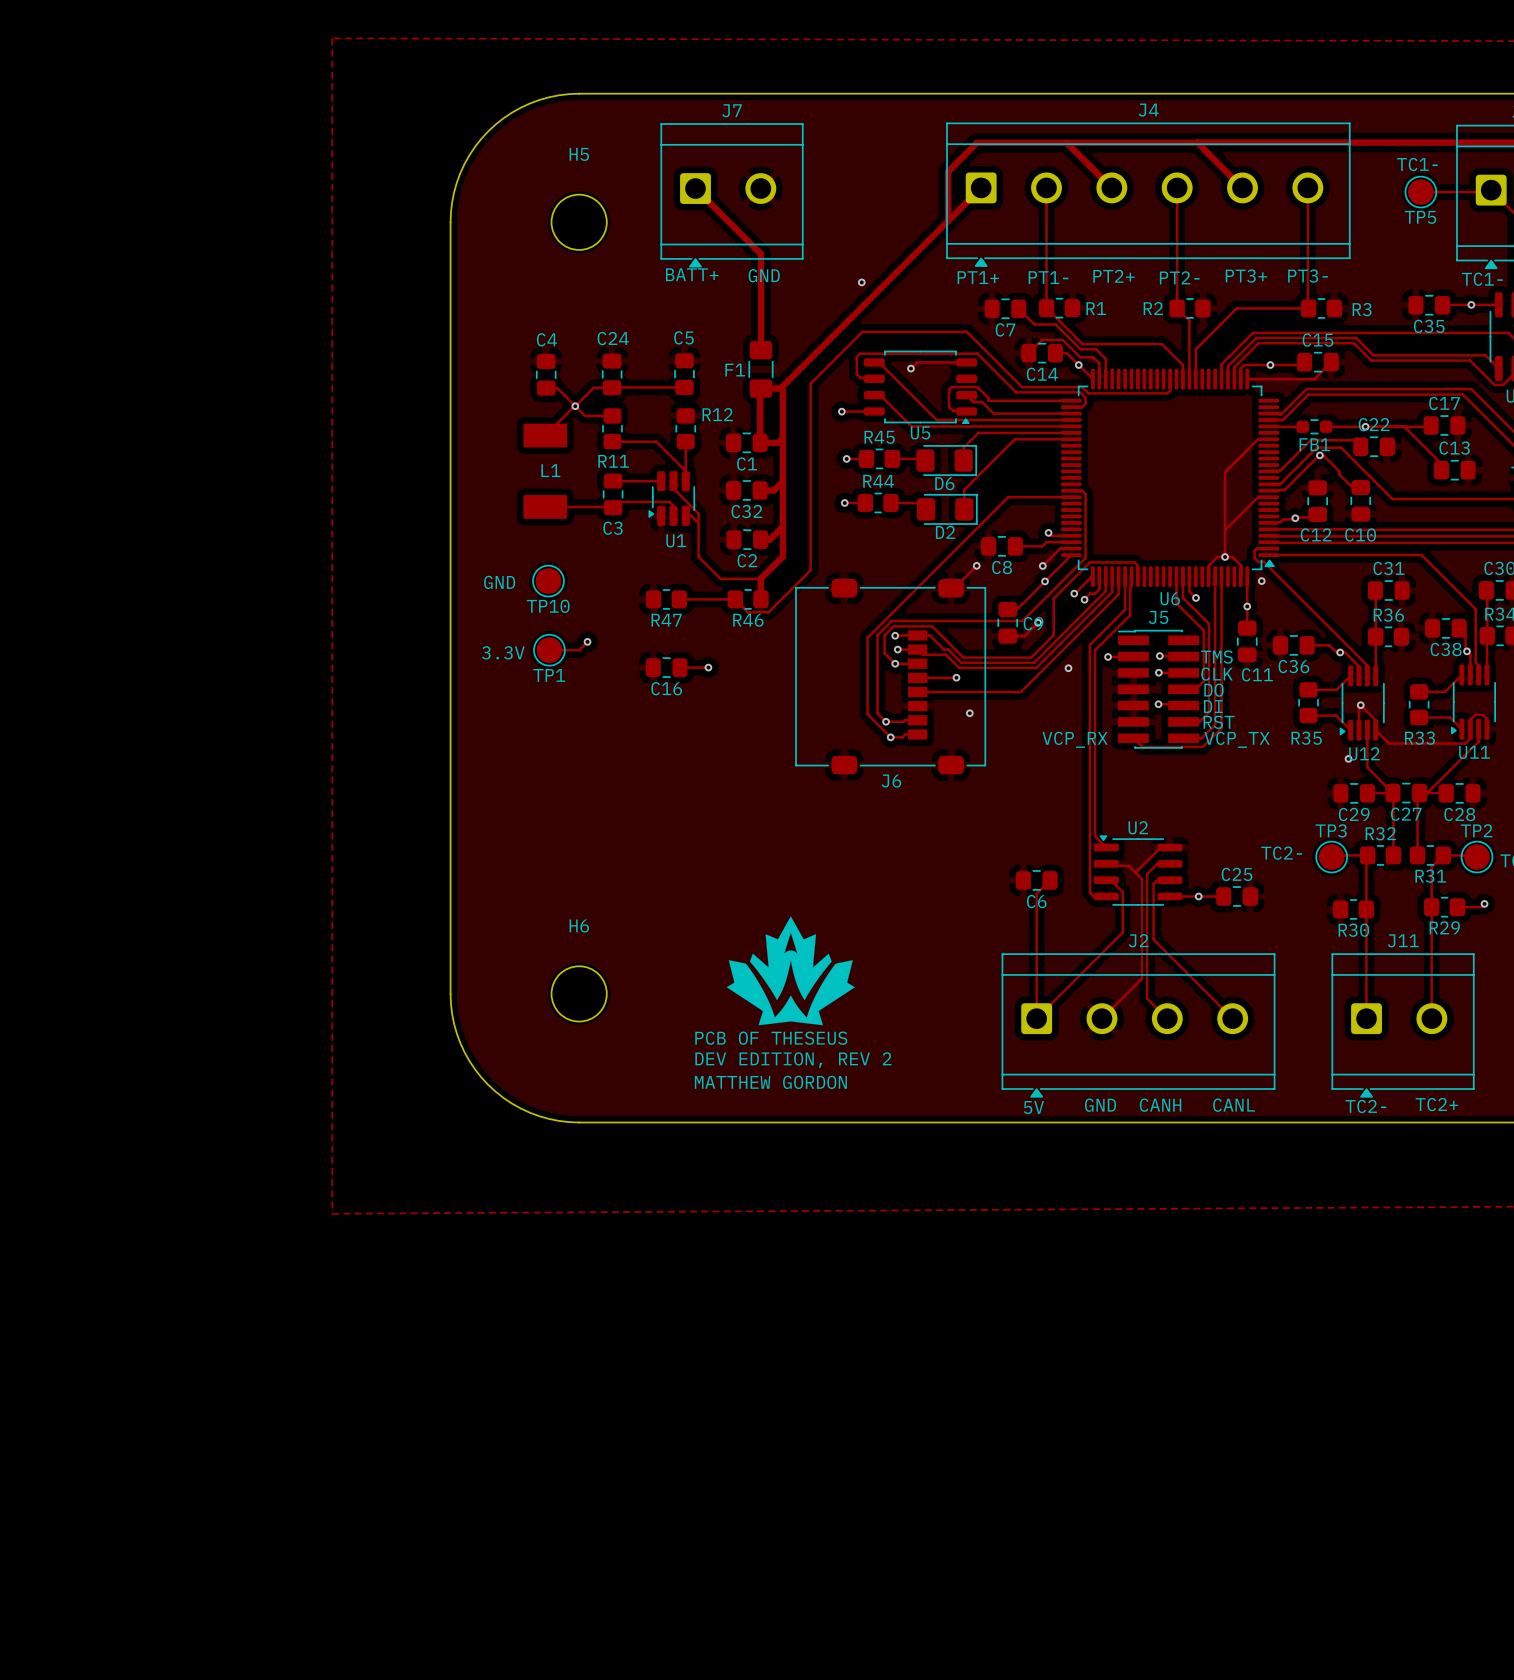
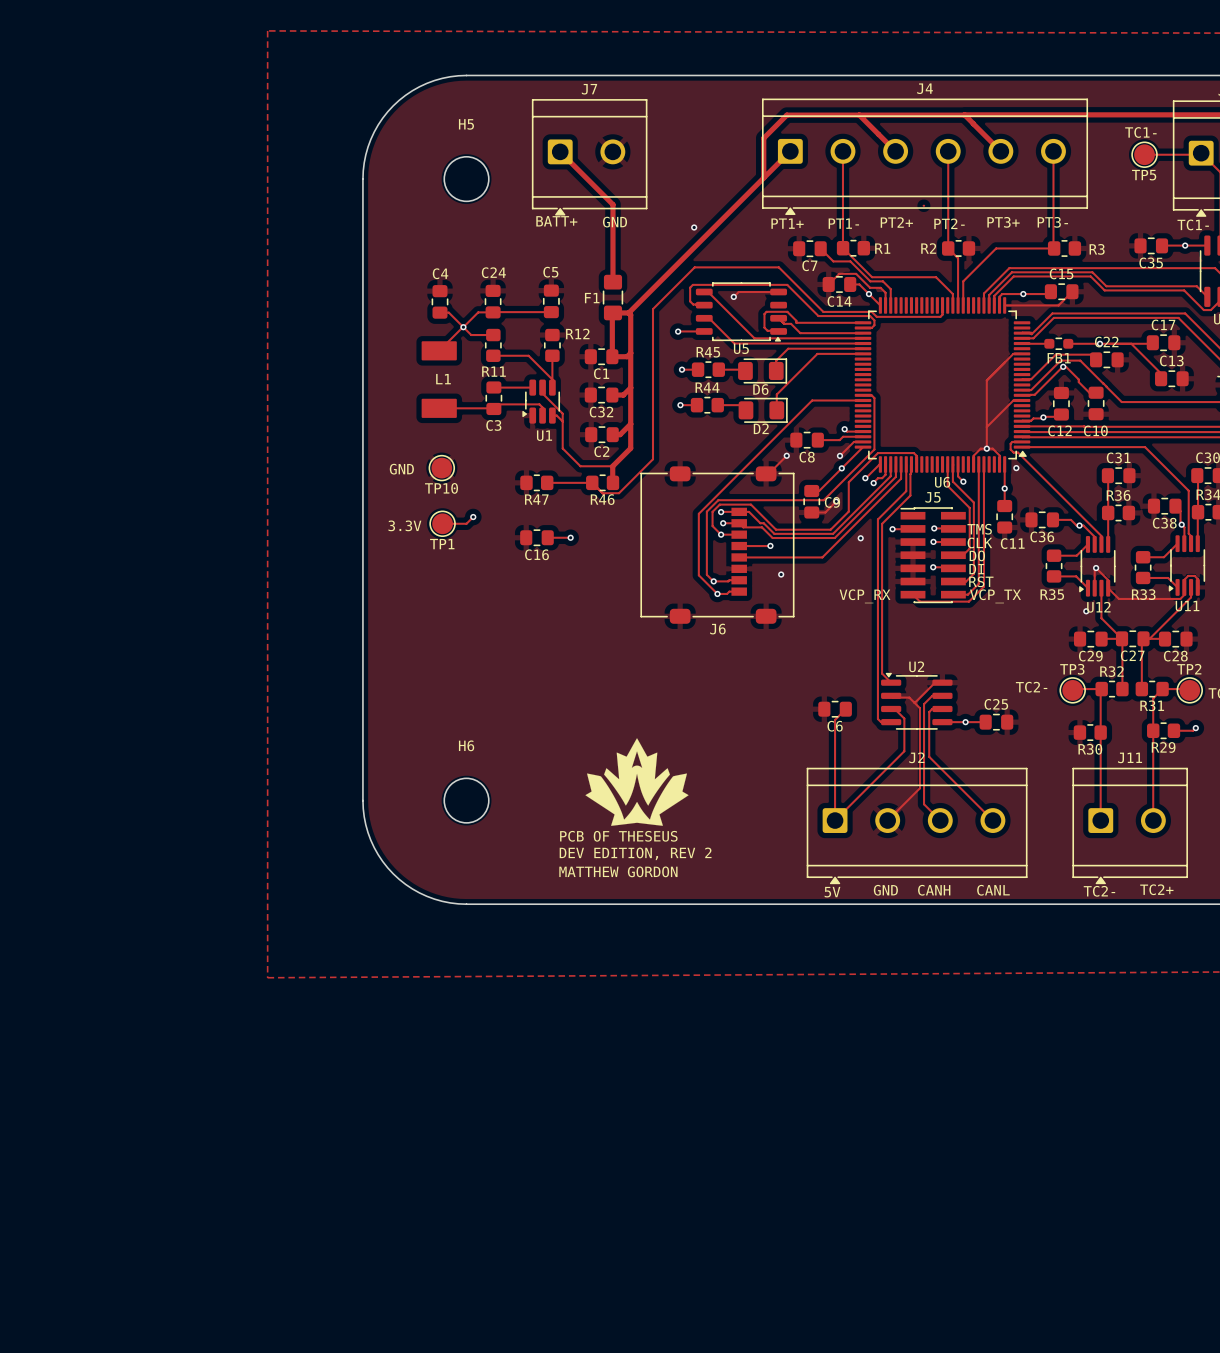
track: none -> (923, 205) (924, 205)

